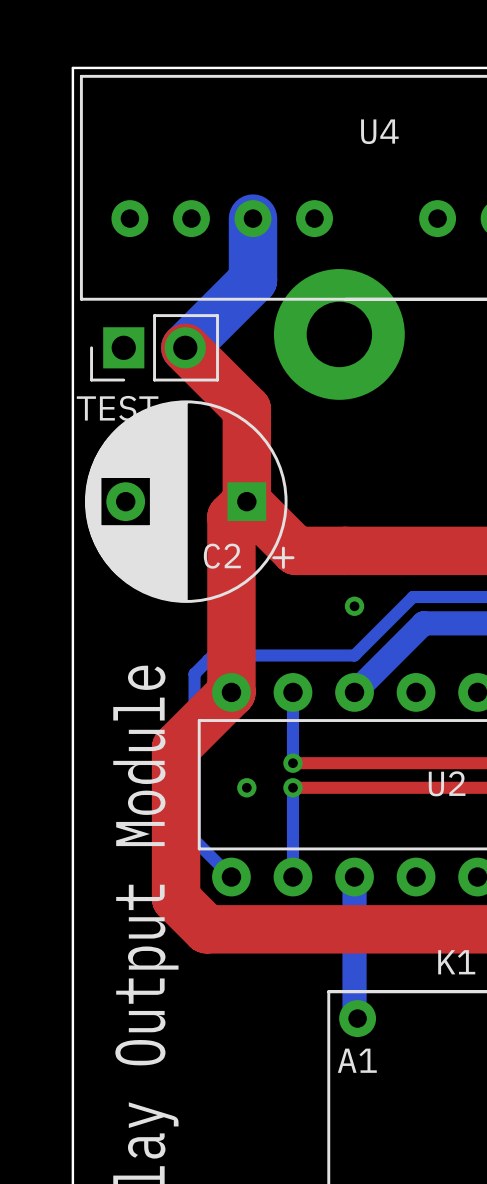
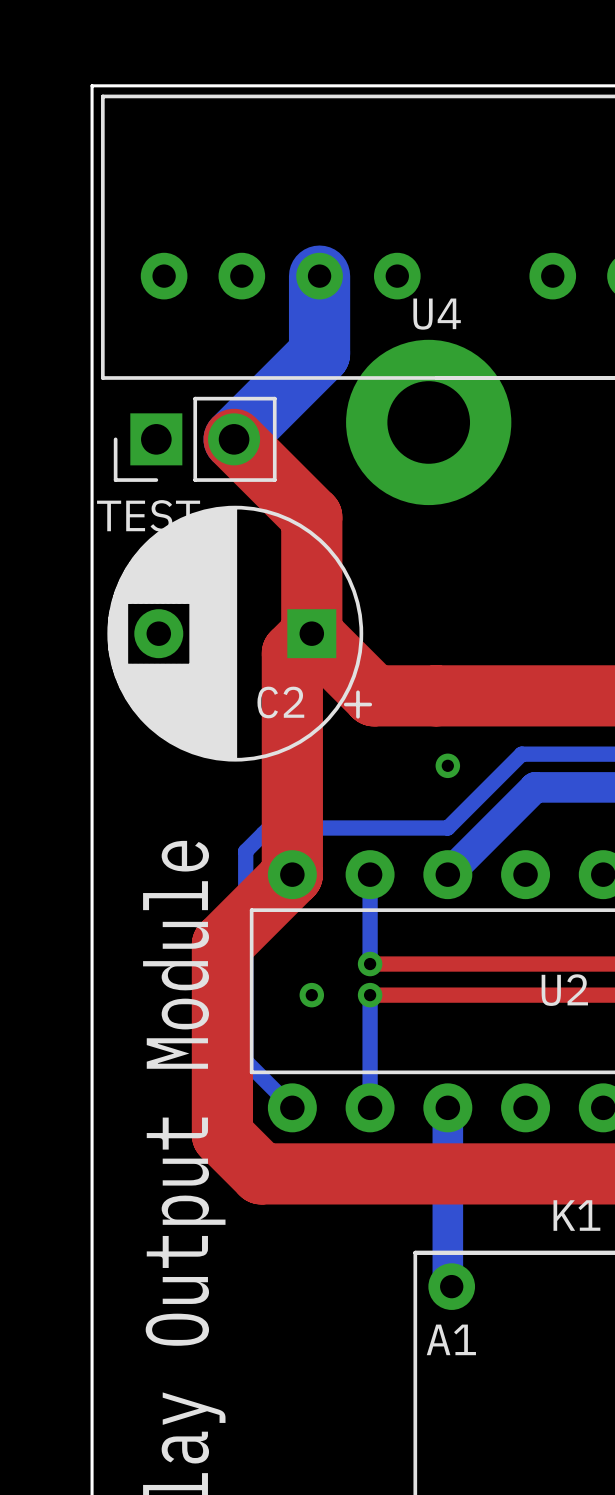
U4 name position: U4 (379, 131) -> U4 (437, 314)

